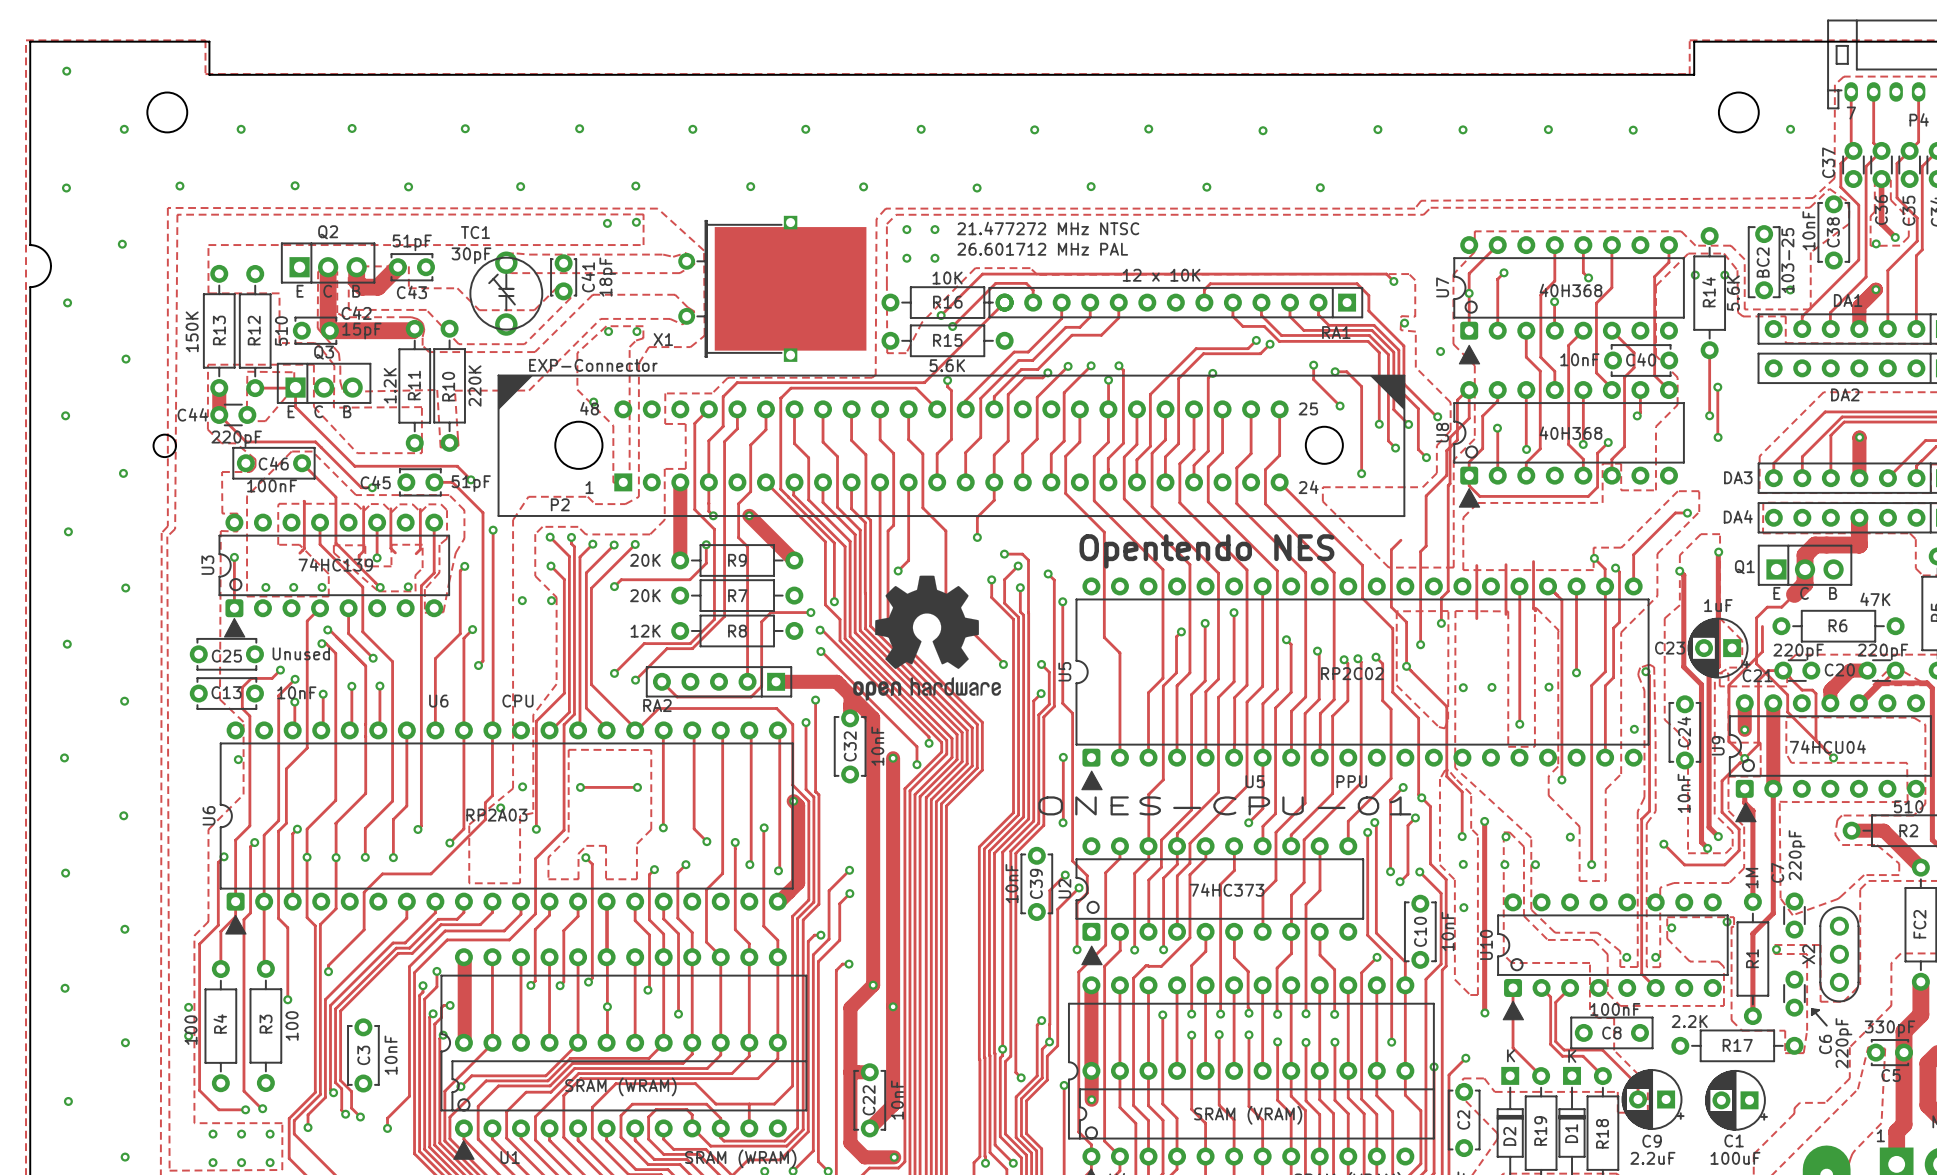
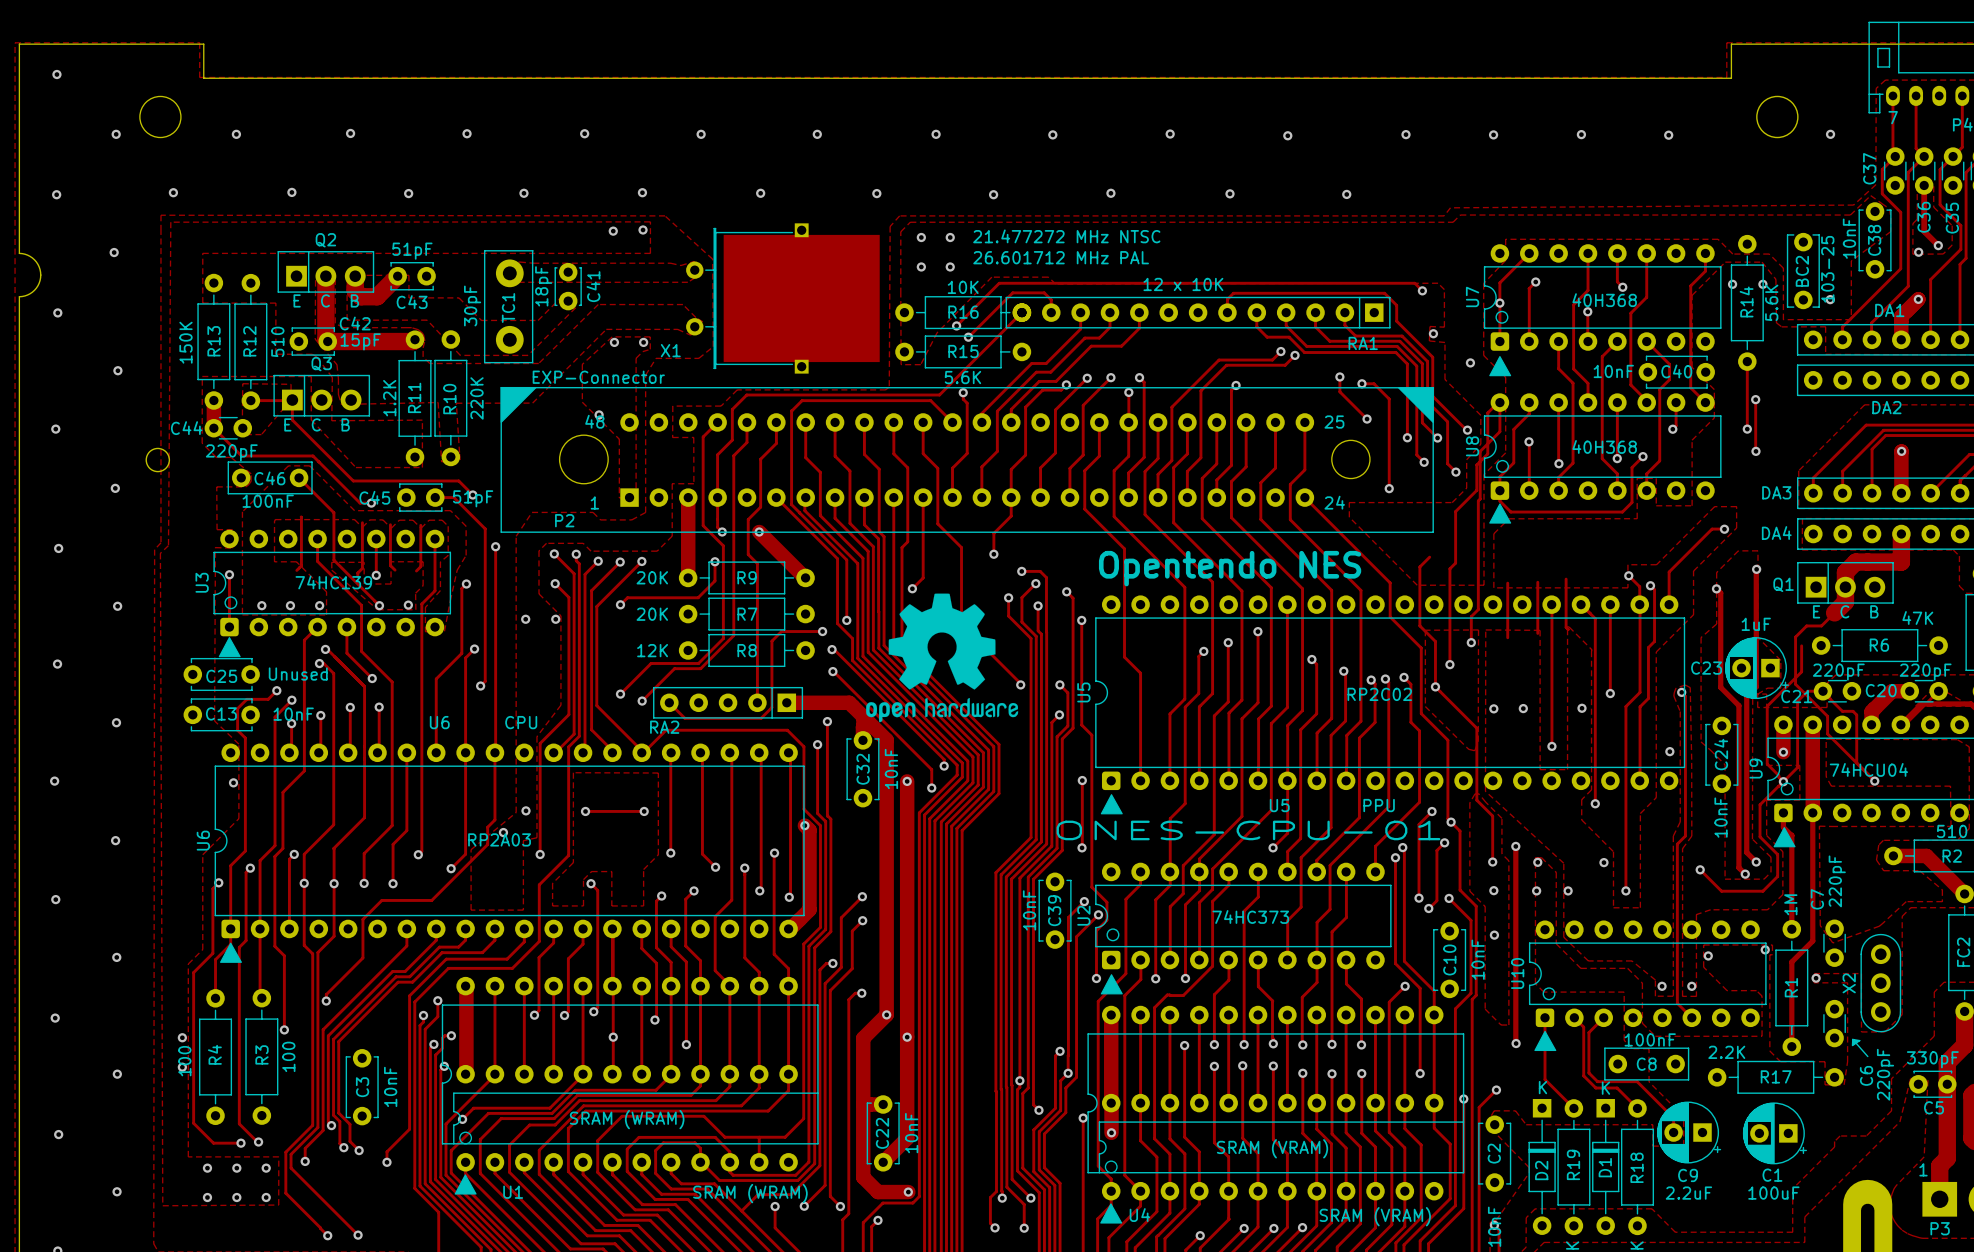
TC1 name position: TC1 (475, 232) -> TC1 (508, 307)
line: none -> (532, 250) (532, 362) (484, 362) (484, 250) (532, 250)
TC1 footprint: [469, 251, 543, 336] -> [495, 259, 524, 354]
TC1 value position: 30pF (471, 255) -> 30pF (472, 305)
C41 value position: 18pF (607, 277) -> 18pF (543, 286)

